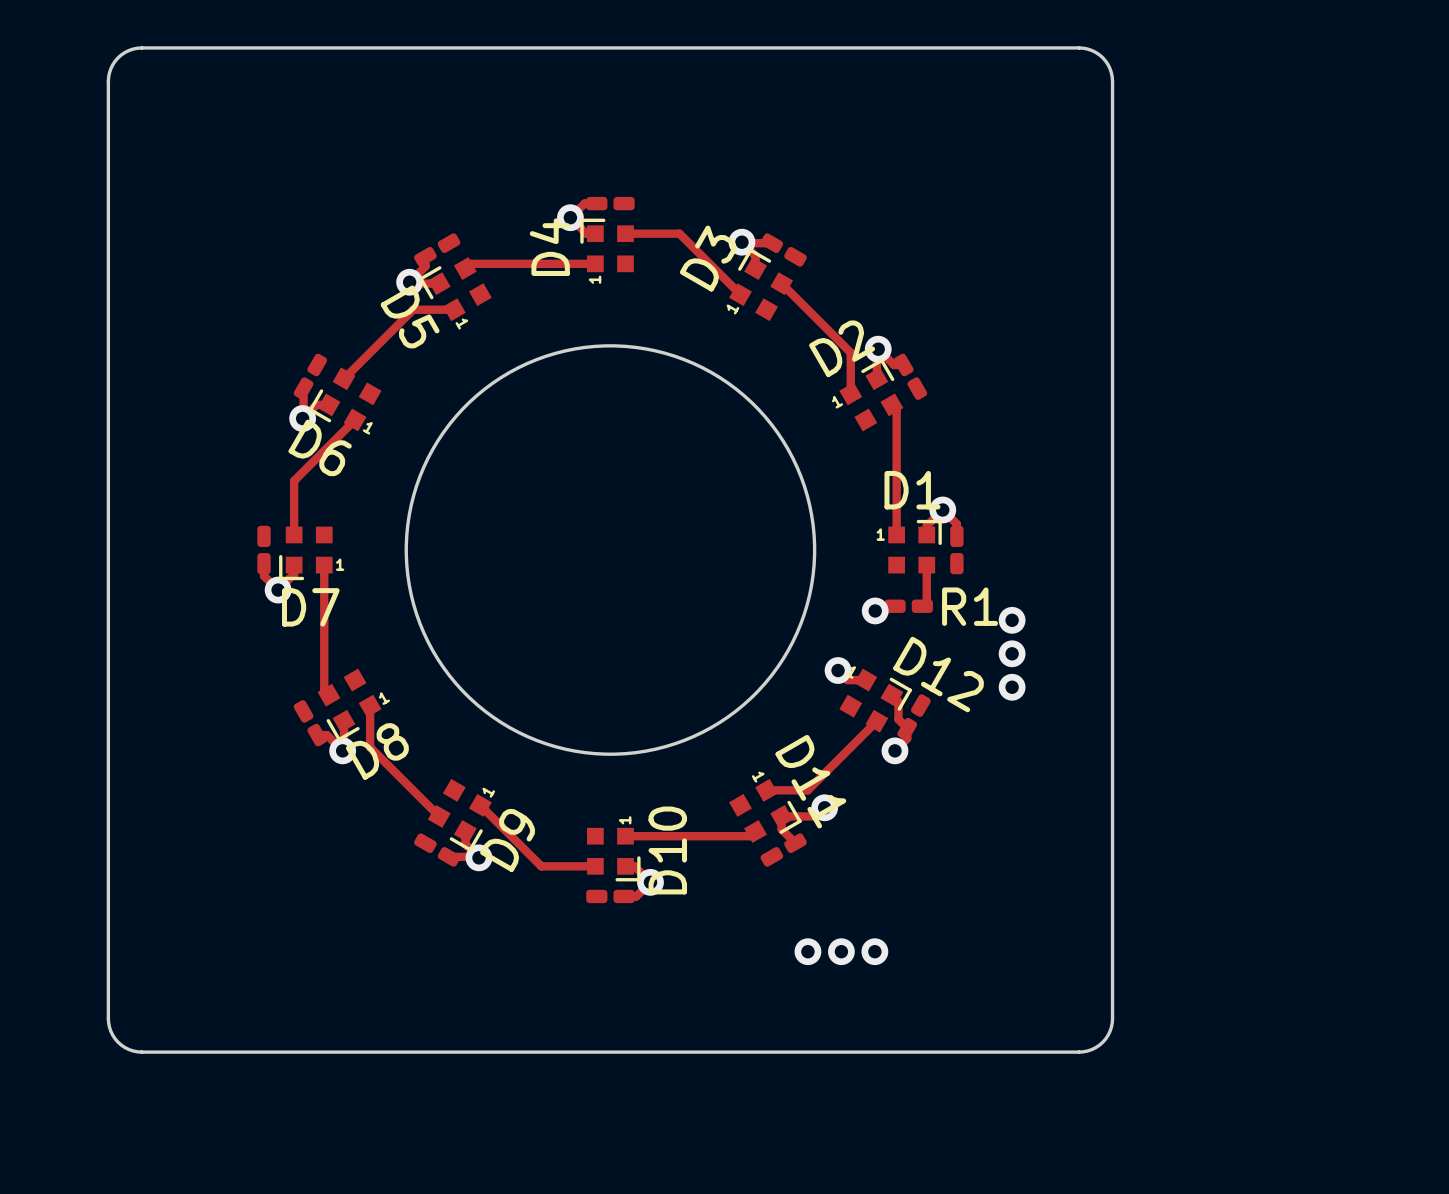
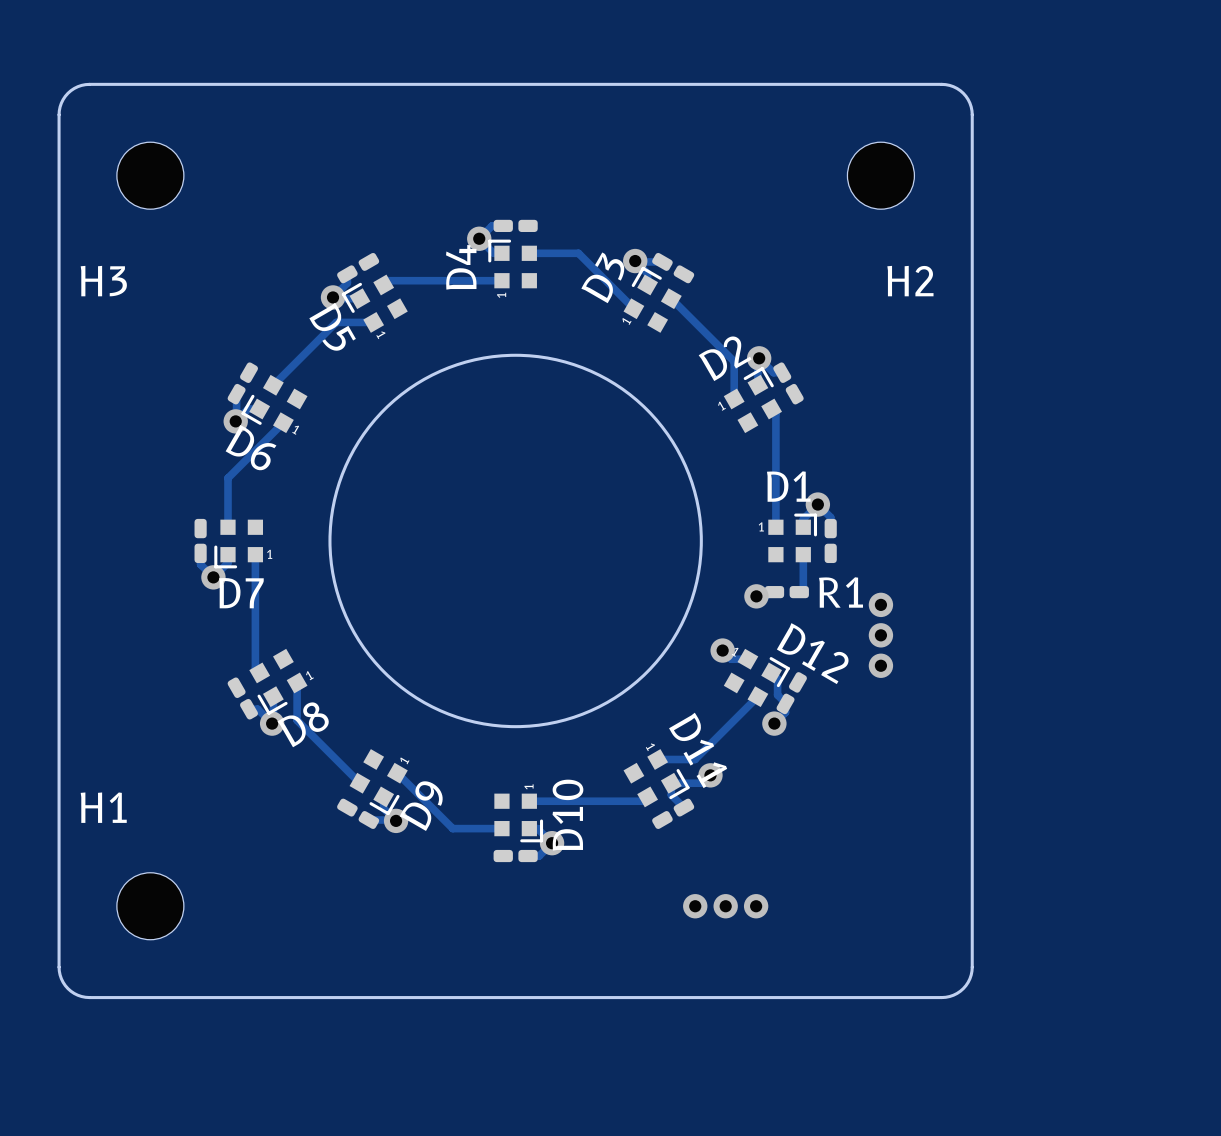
H3: none -> (150, 175)
H2: none -> (880, 175)
H1: none -> (150, 906)

